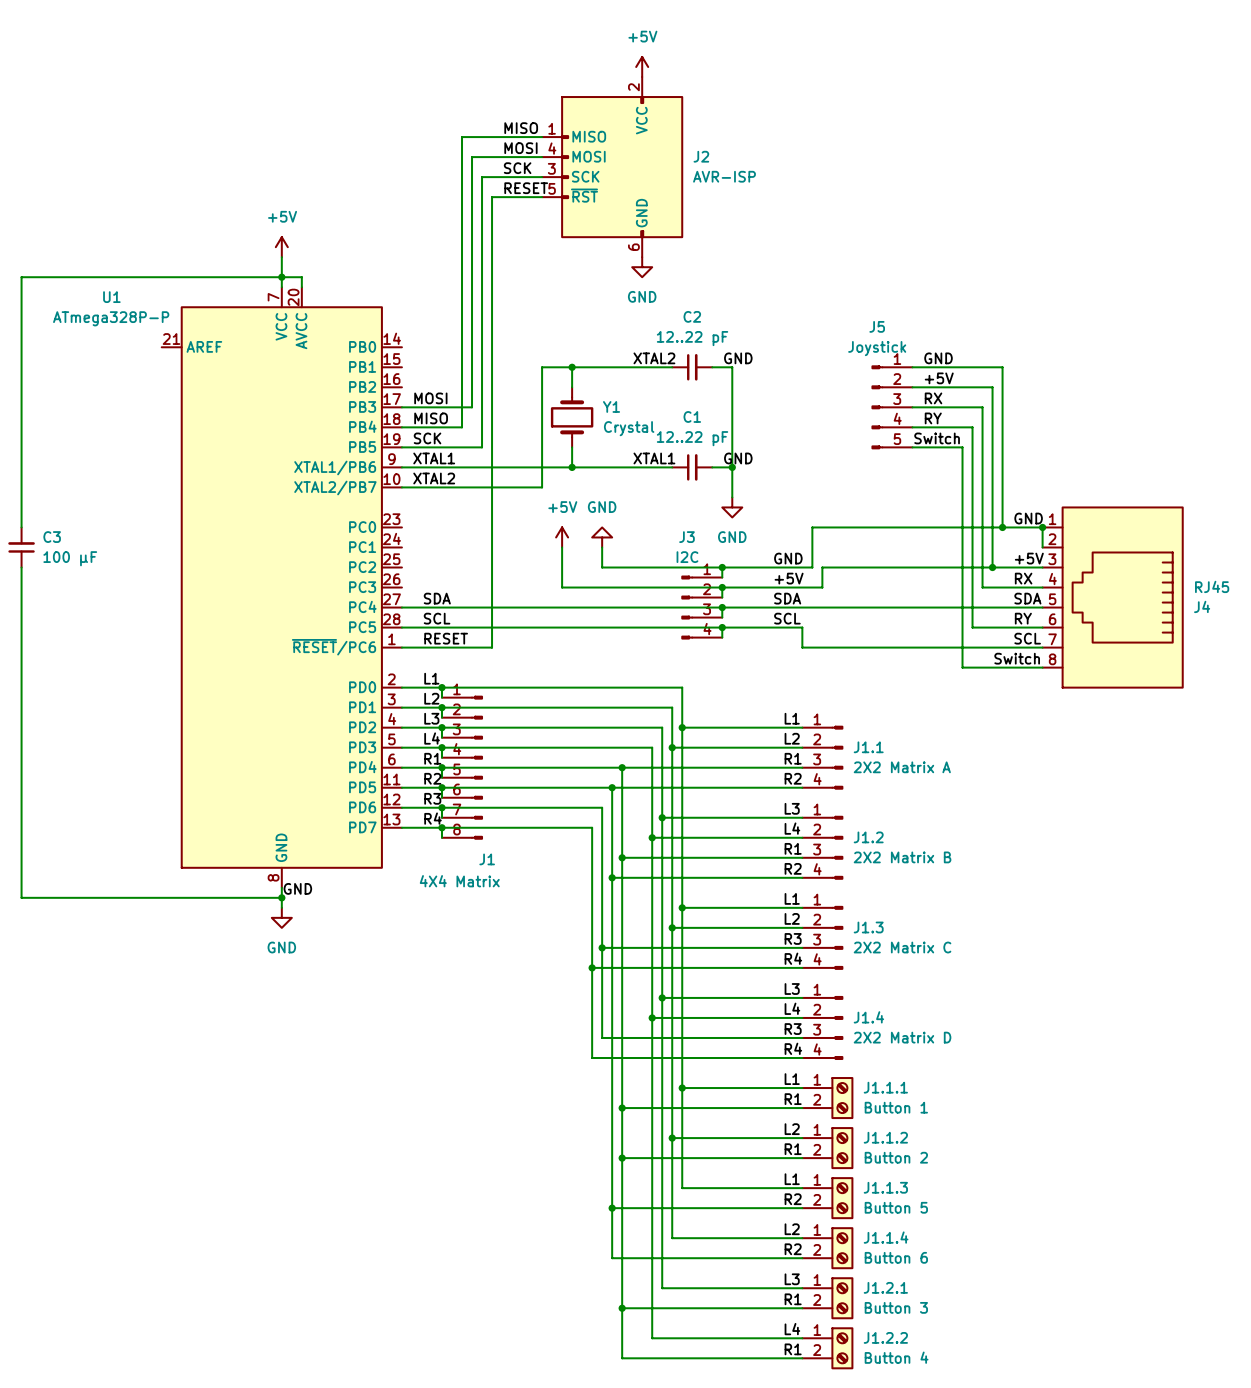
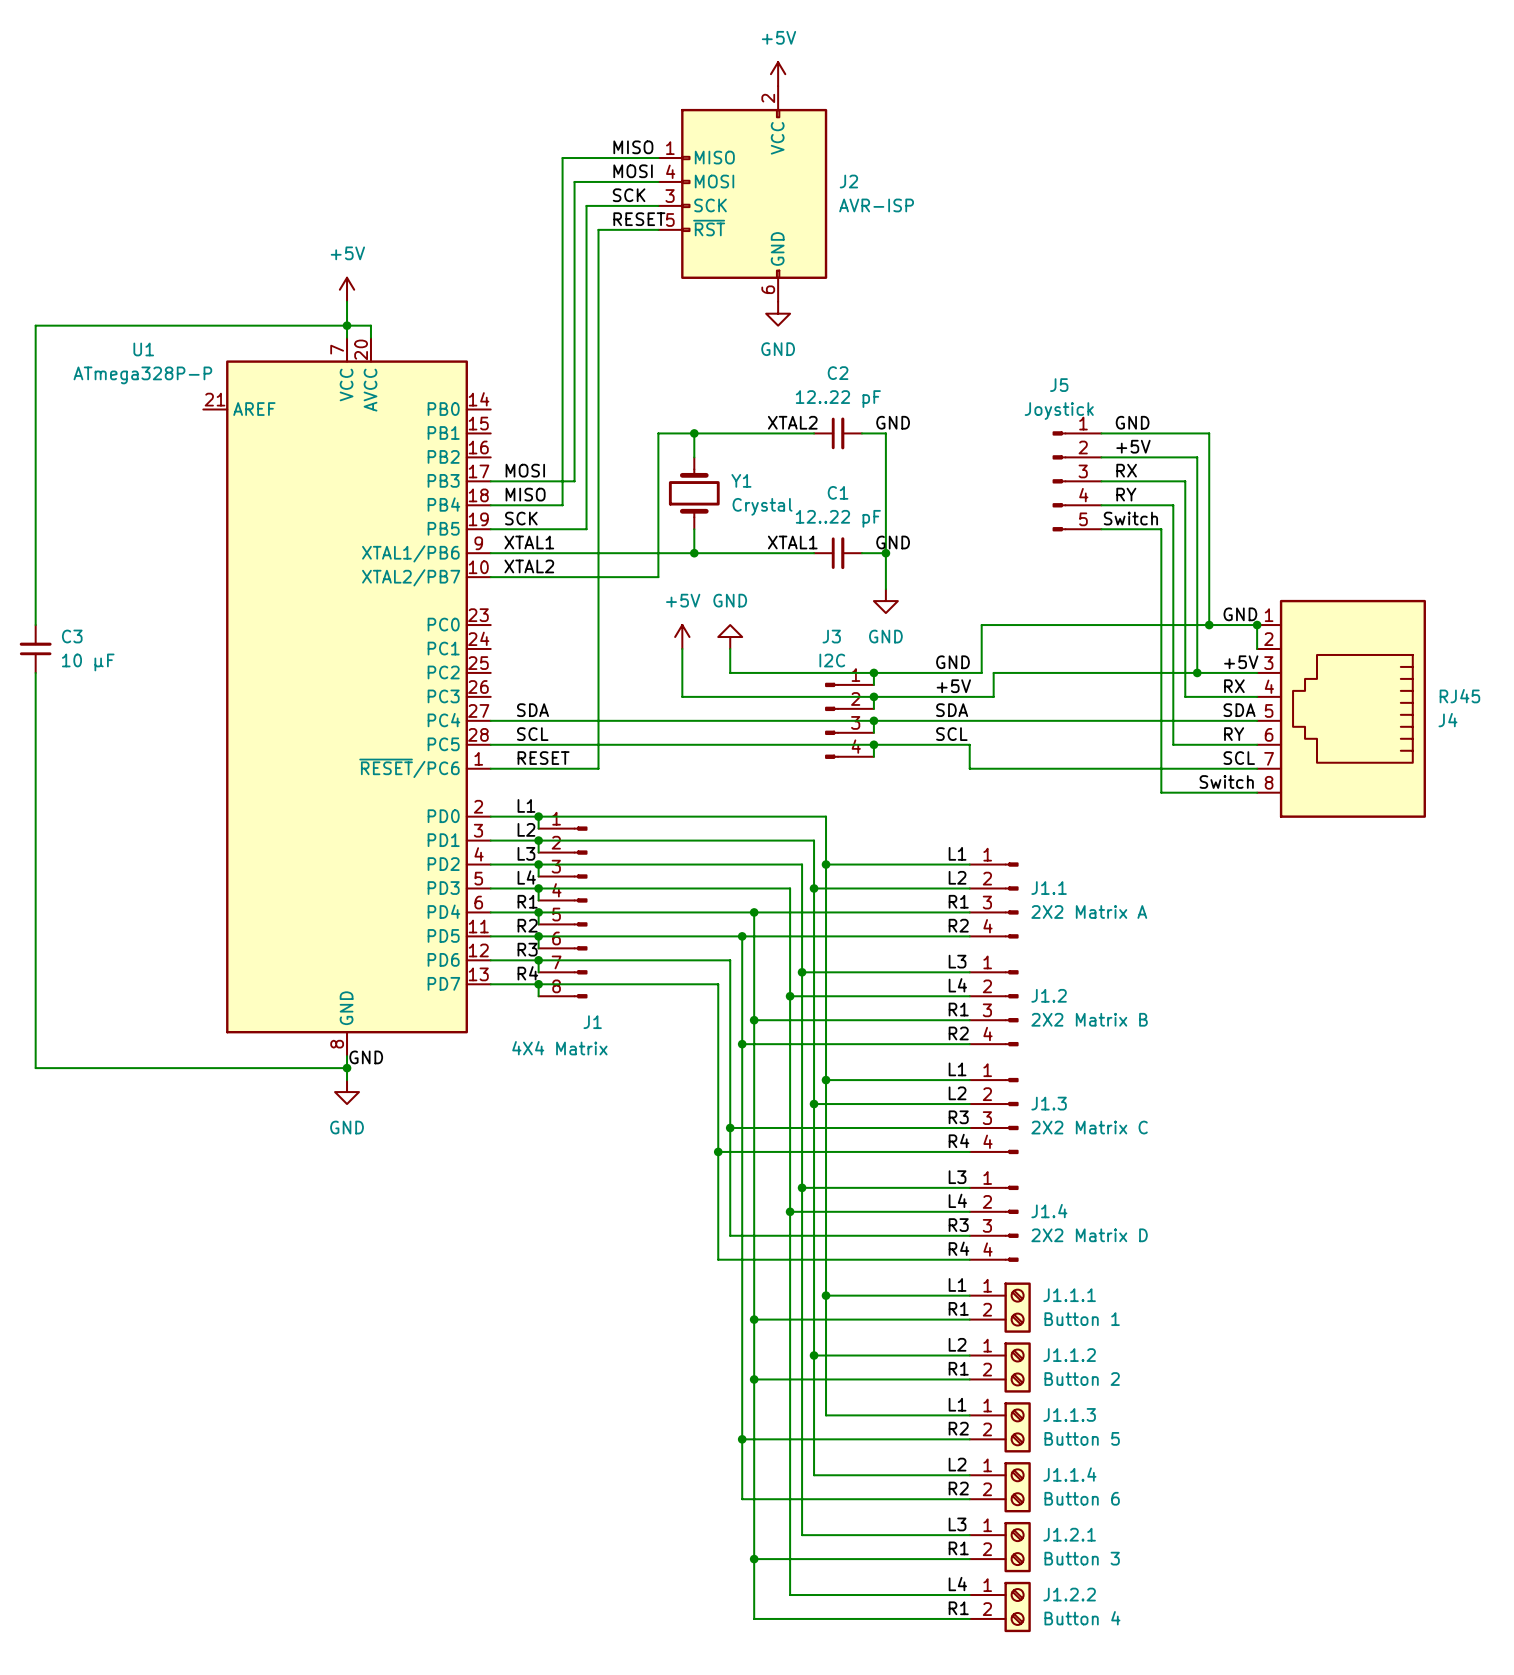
C3 value: 100 µF (70, 558) -> 10 µF (88, 662)

